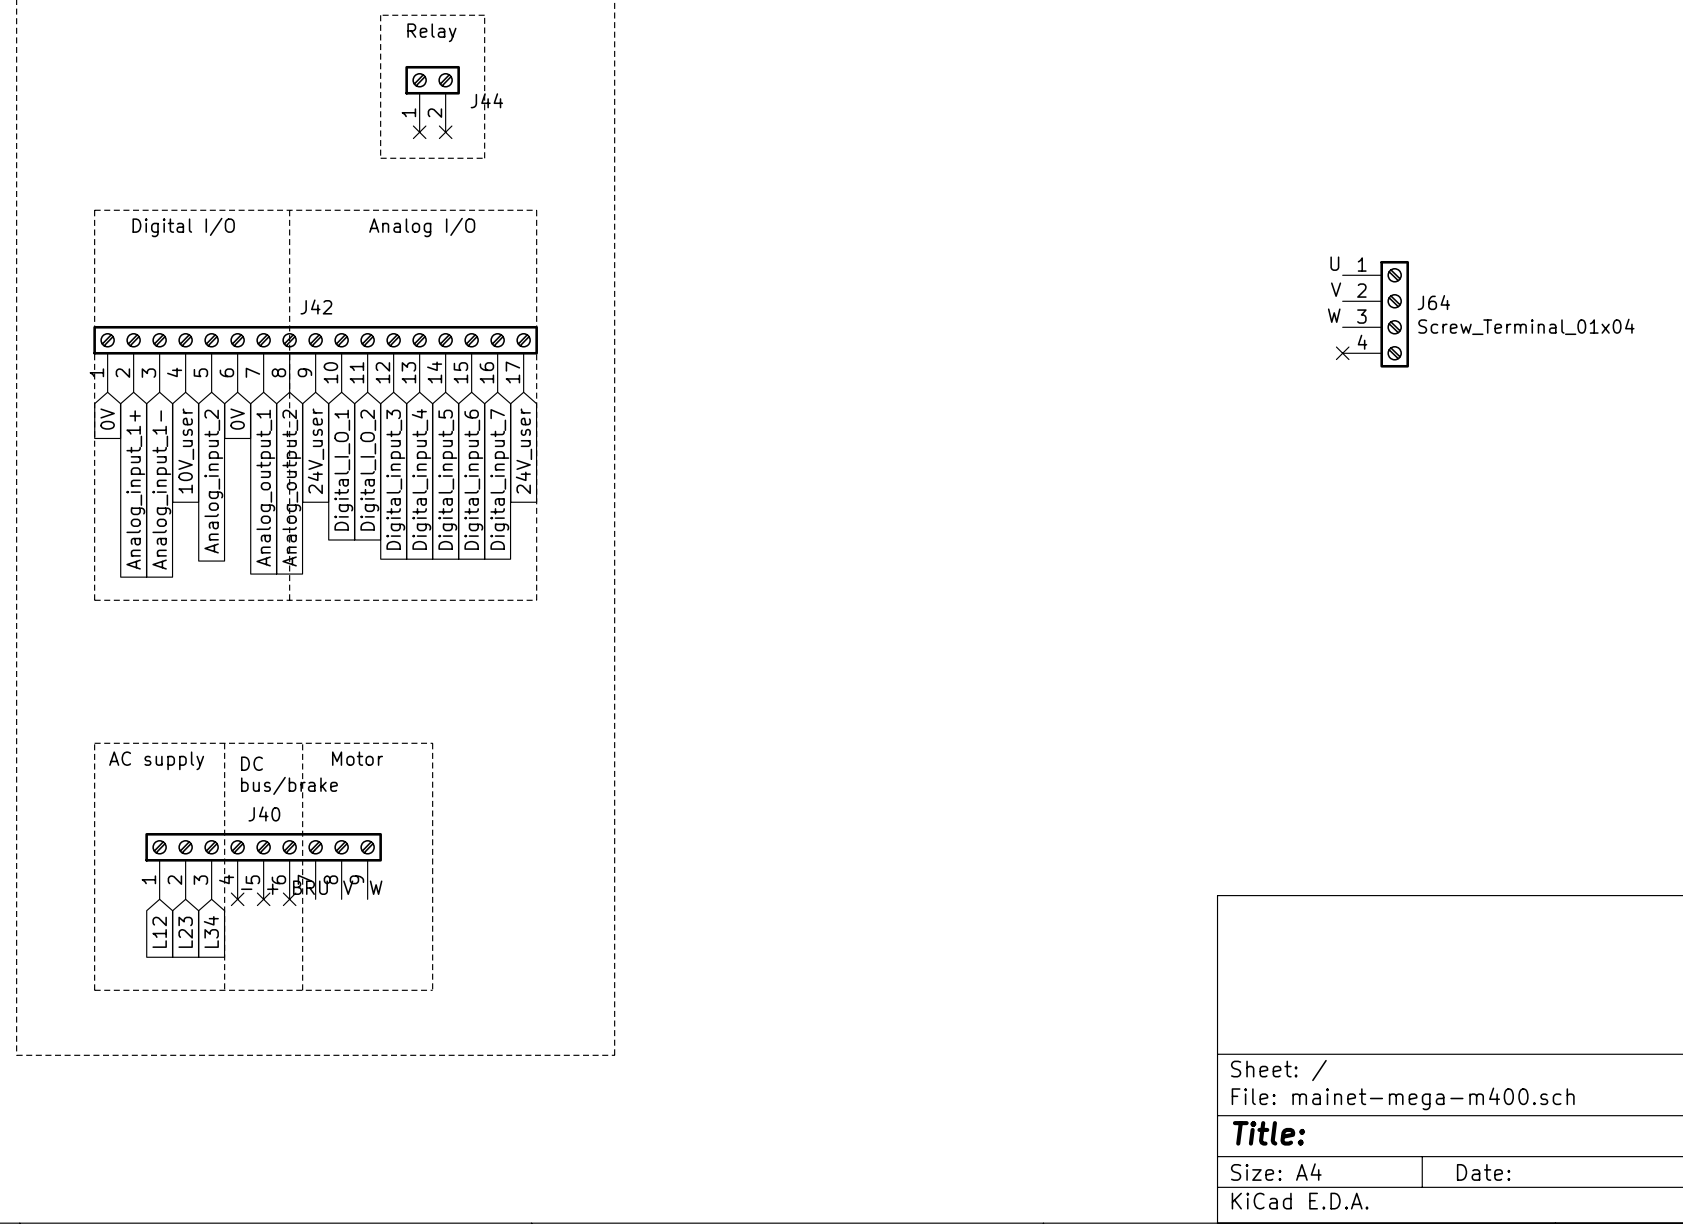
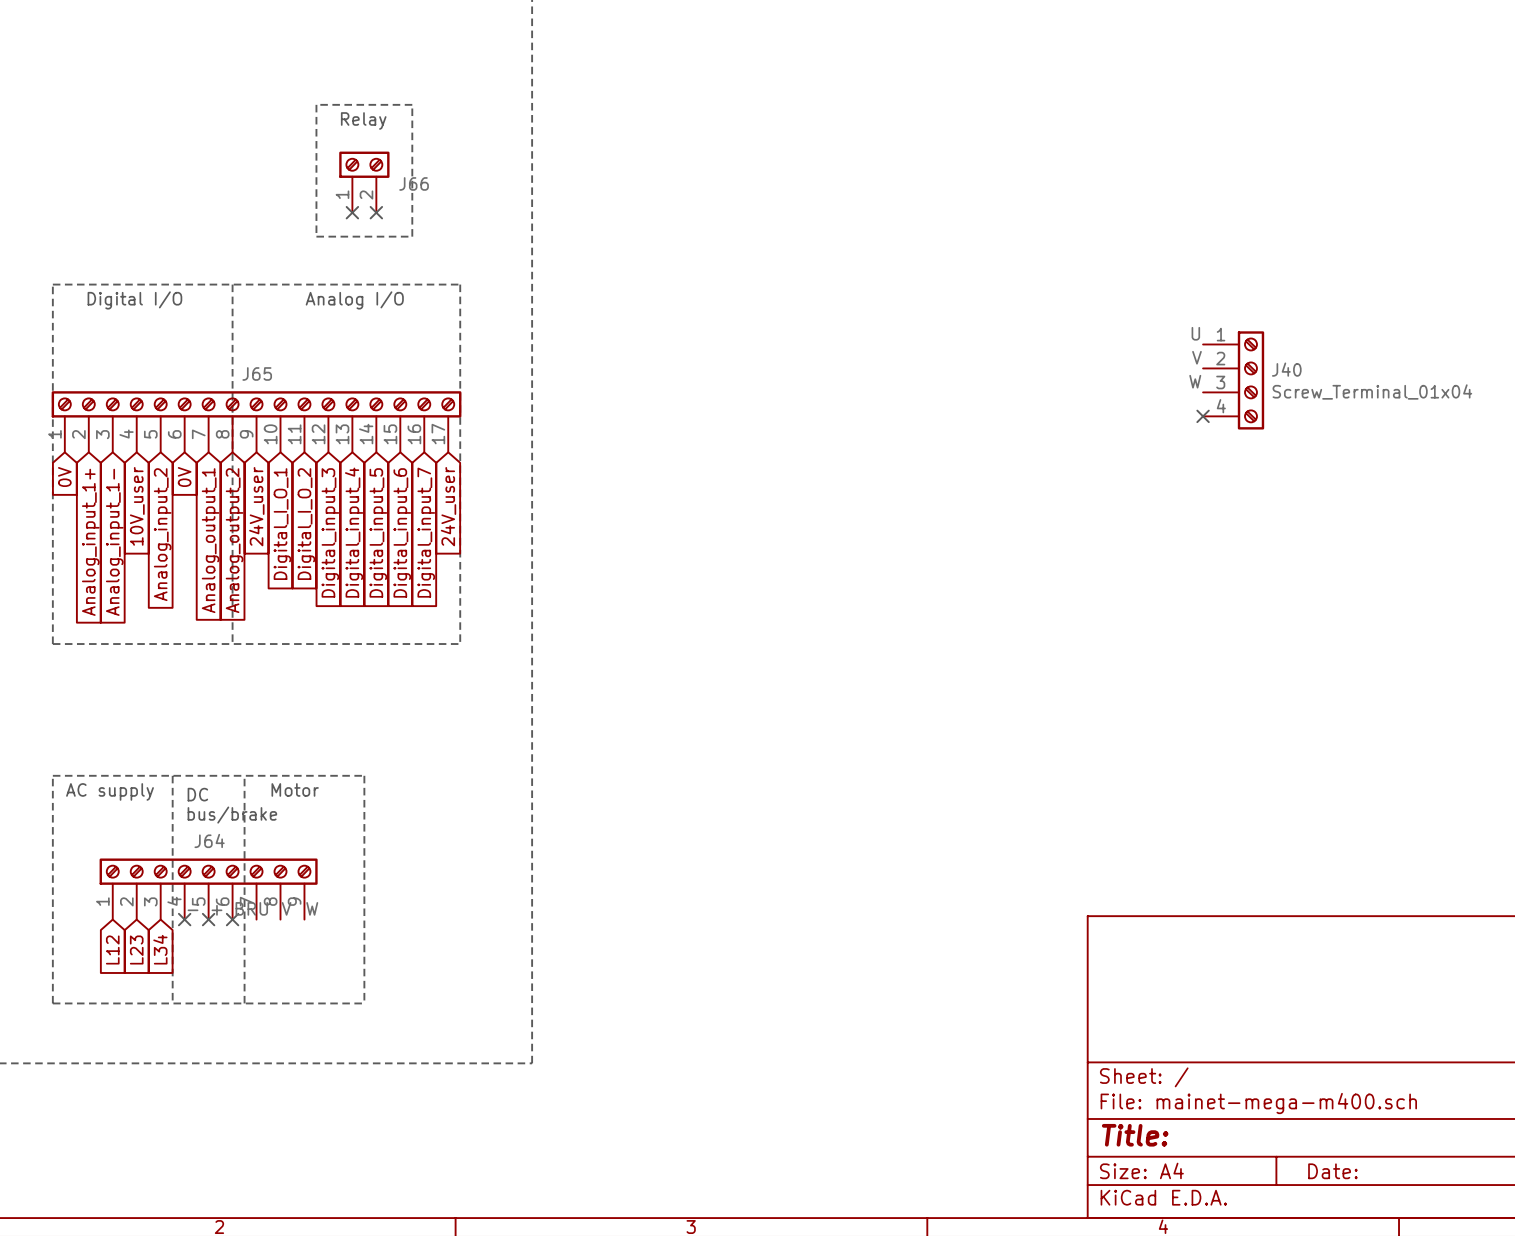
J44 name: J44 (486, 100) -> J66 (414, 183)
J64 name: J64 (1433, 302) -> J40 (1286, 369)
J42 name: J42 (316, 306) -> J65 (257, 373)
J40 name: J40 (264, 814) -> J64 (209, 840)

